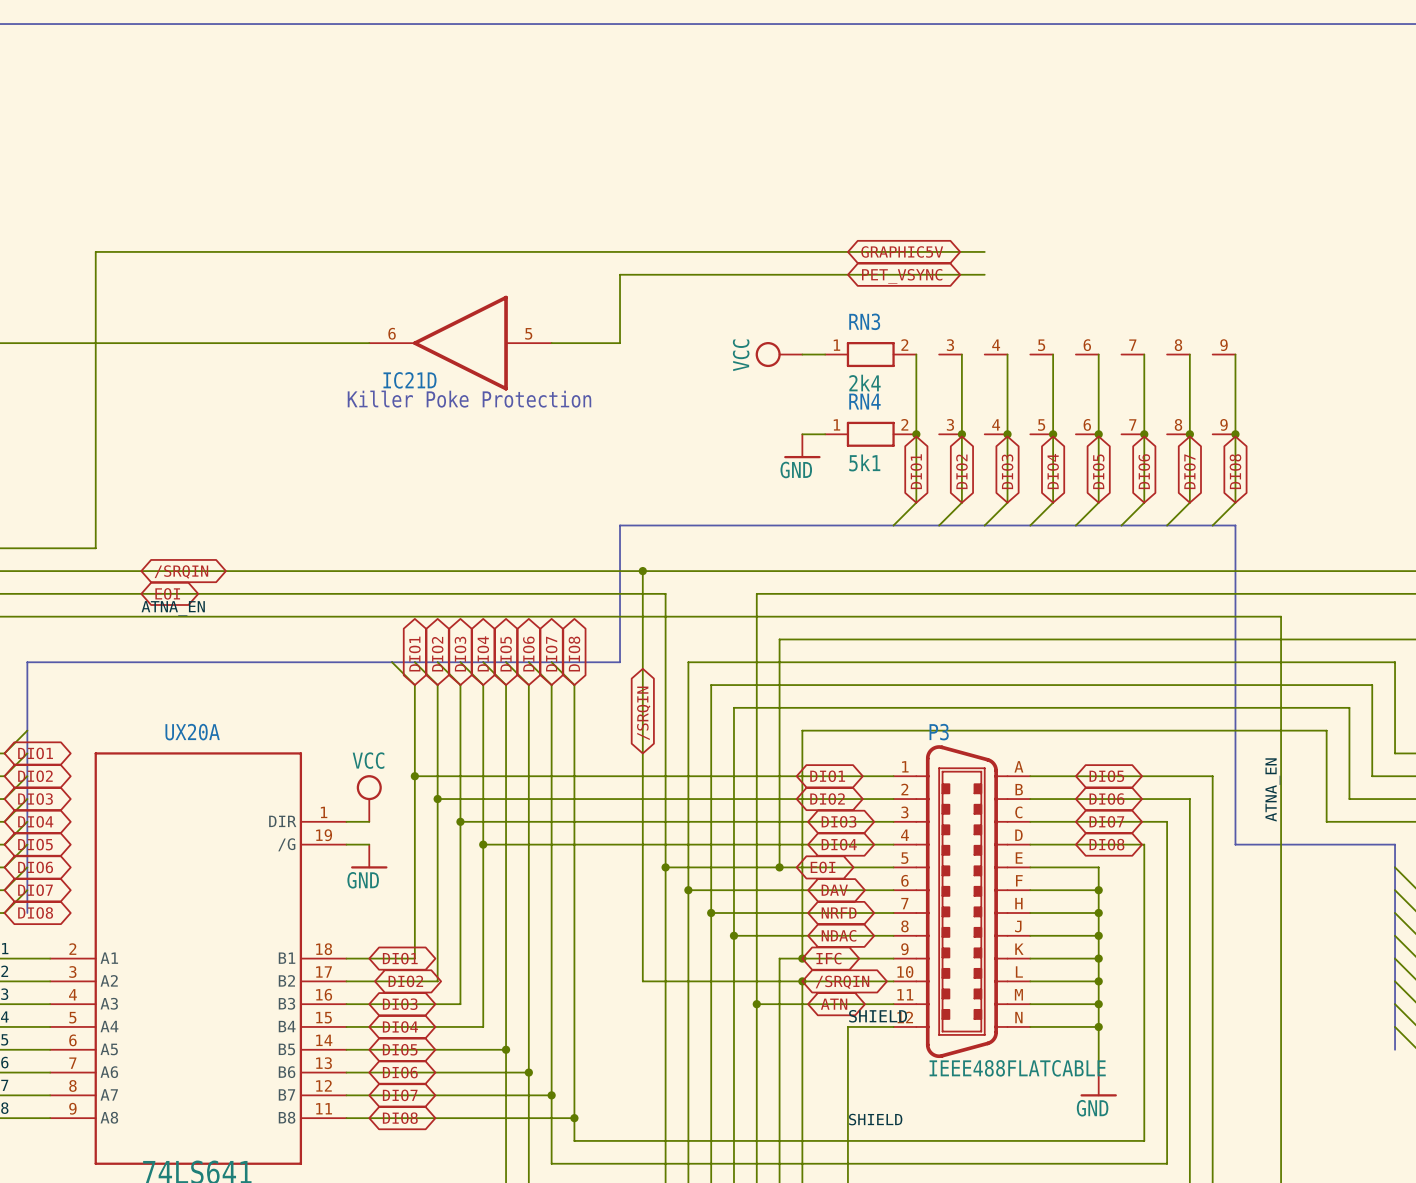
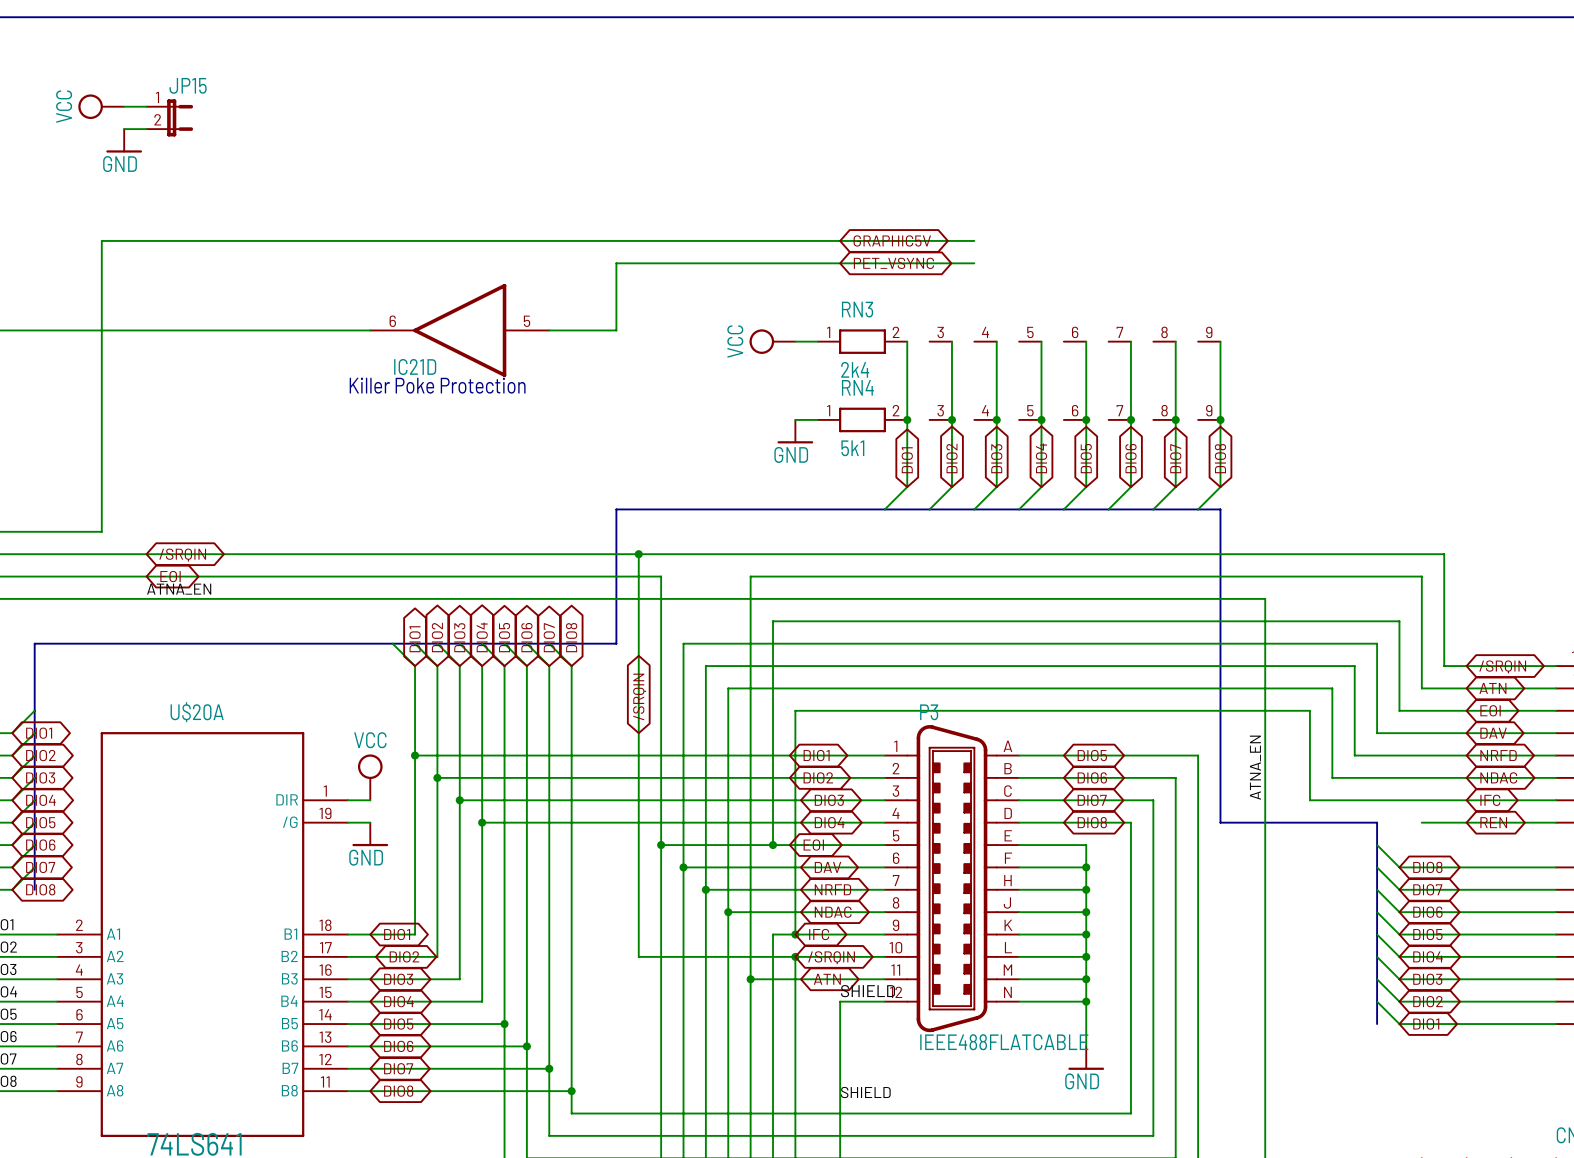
power symbol: none -> VCC (101, 106)
wire: none -> (124, 106) (146, 106)
JP15: none -> (169, 117)
wire: none -> (124, 129) (146, 129)
power symbol: none -> GND (124, 140)
UX20A name: UX20A (192, 732) -> U$20A (197, 712)

